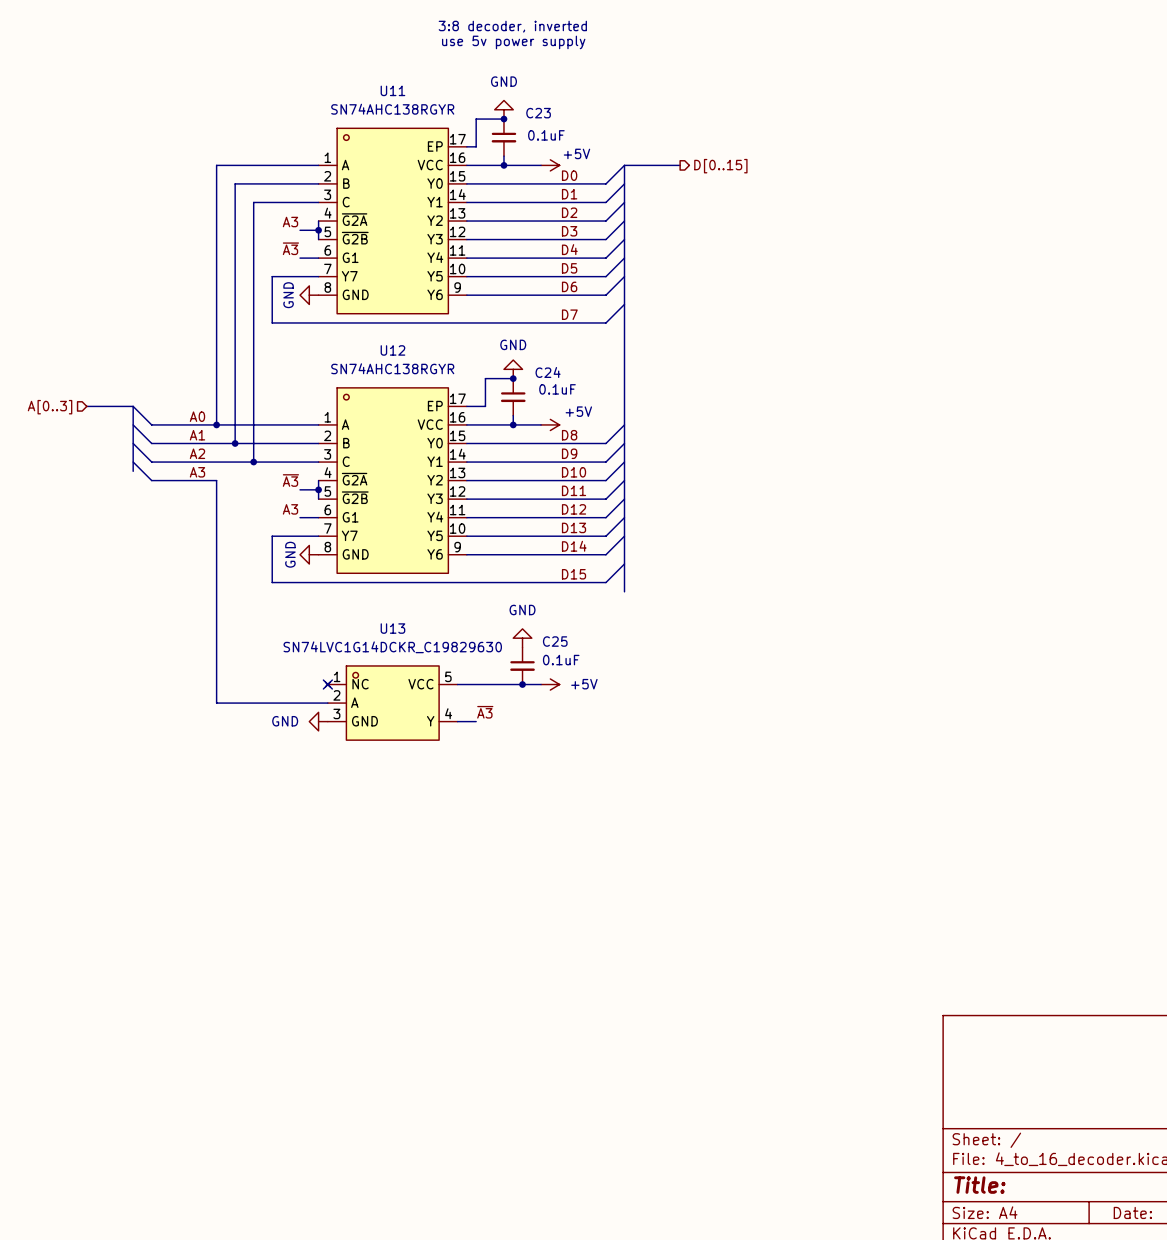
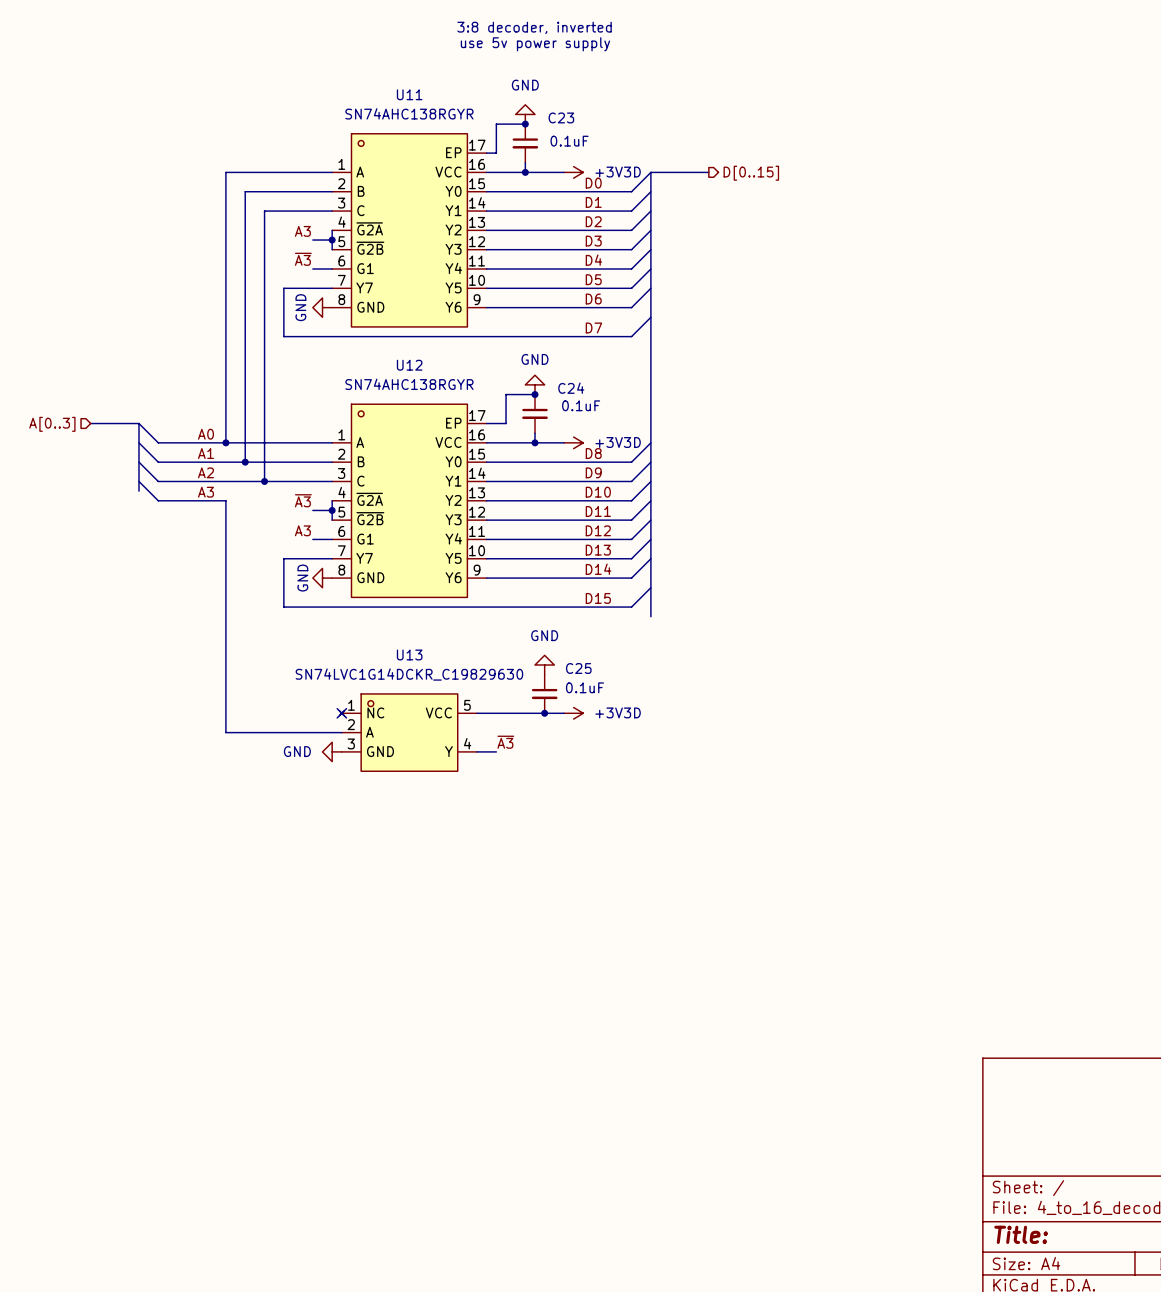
power symbol: +5V (550, 165) -> +3V3D (573, 172)
power symbol: +5V (550, 424) -> +3V3D (573, 442)
power symbol: +5V (550, 684) -> +3V3D (573, 713)

